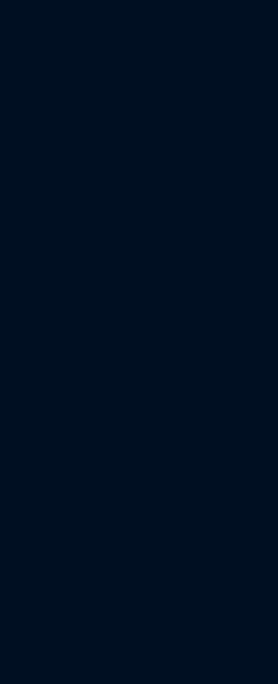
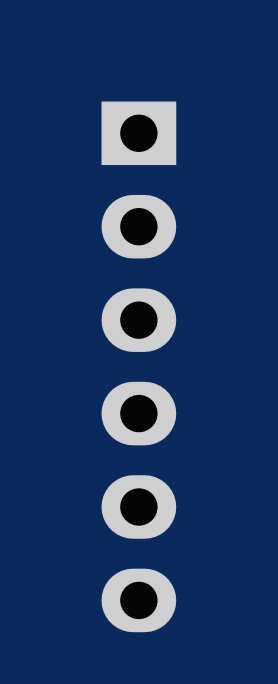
part: none -> (138, 366)

